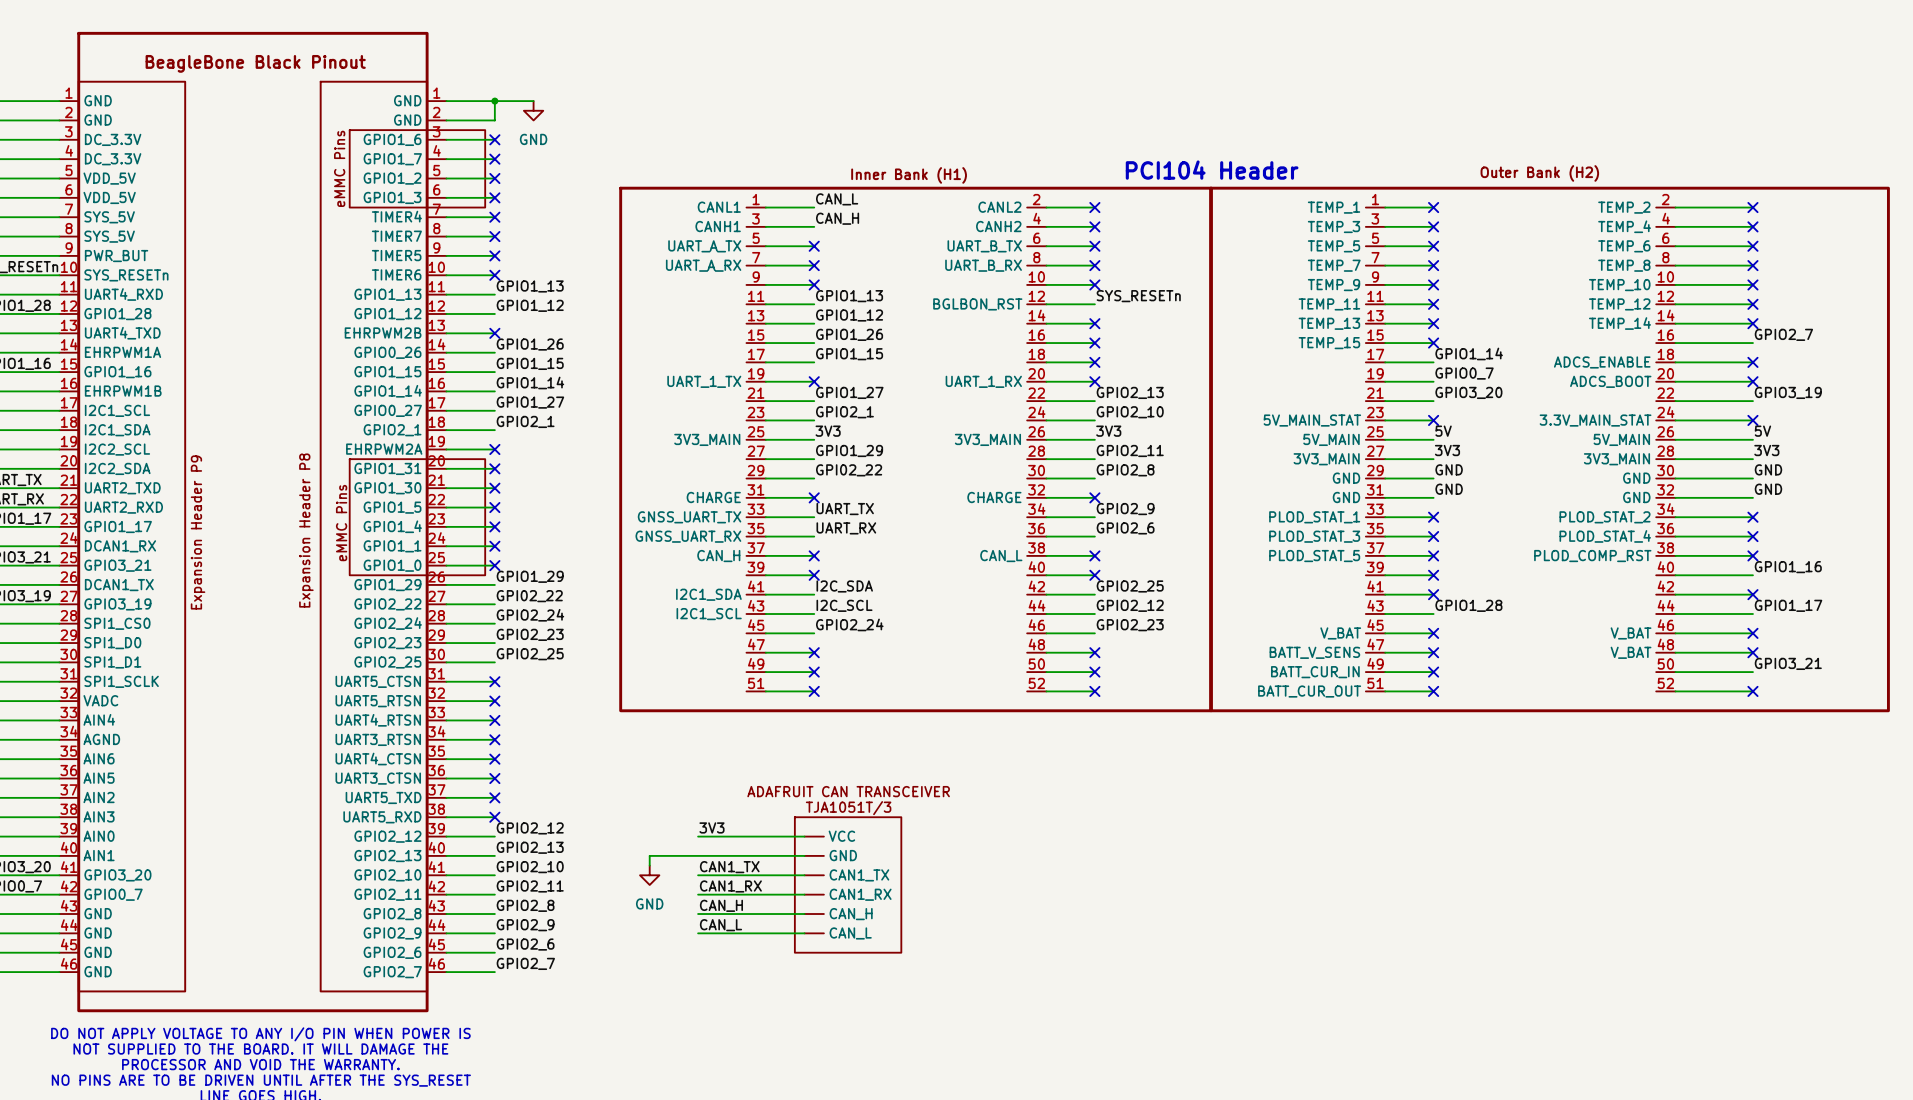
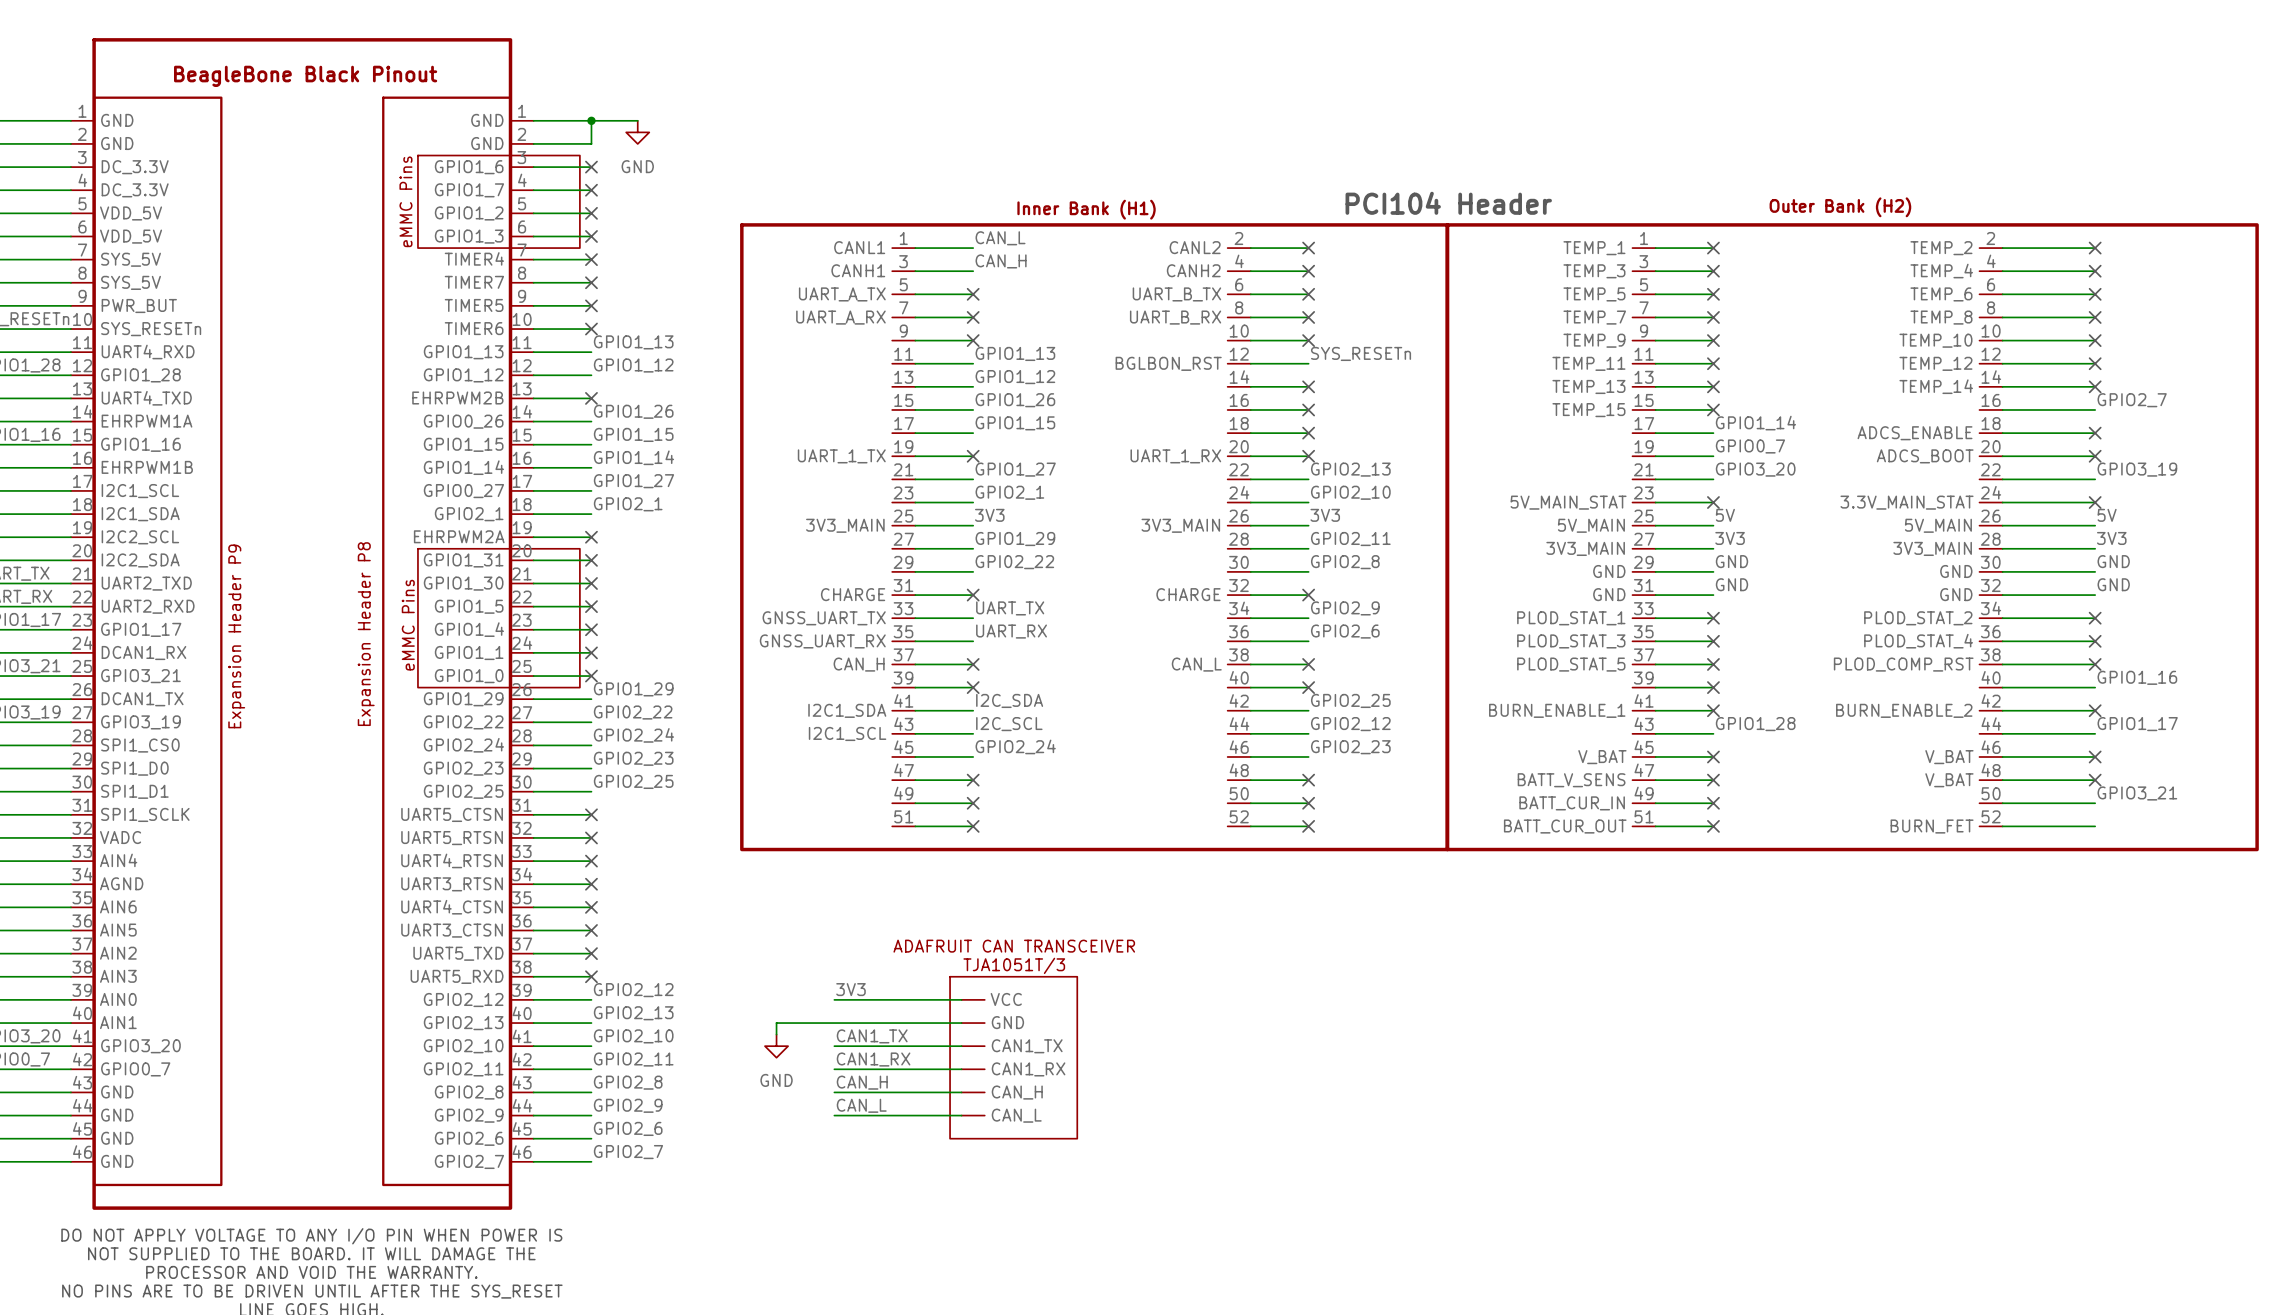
part pin name: none -> BURN_ENABLE_1 (1557, 710)
part pin name: none -> BURN_ENABLE_2 (1904, 710)
part pin name: none -> BURN_FET (1932, 826)
no-connect mark: (1752, 691) -> none

